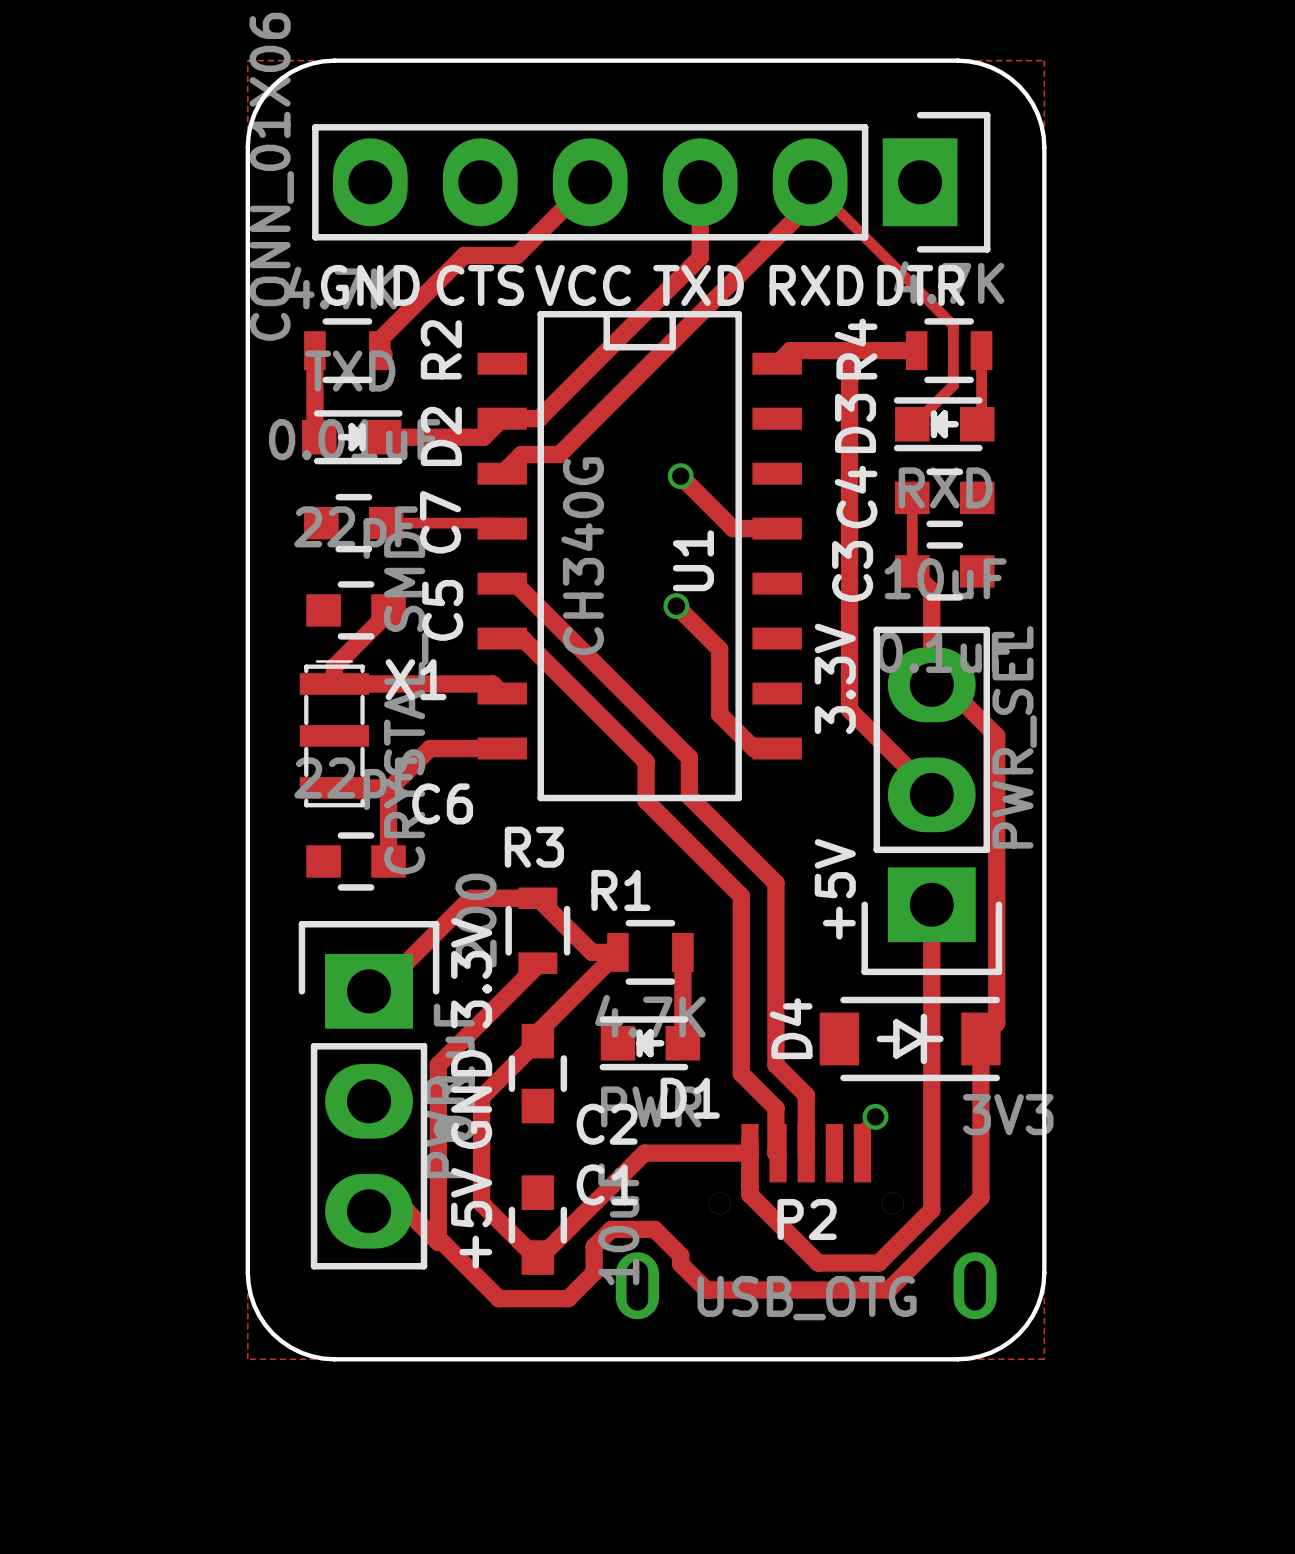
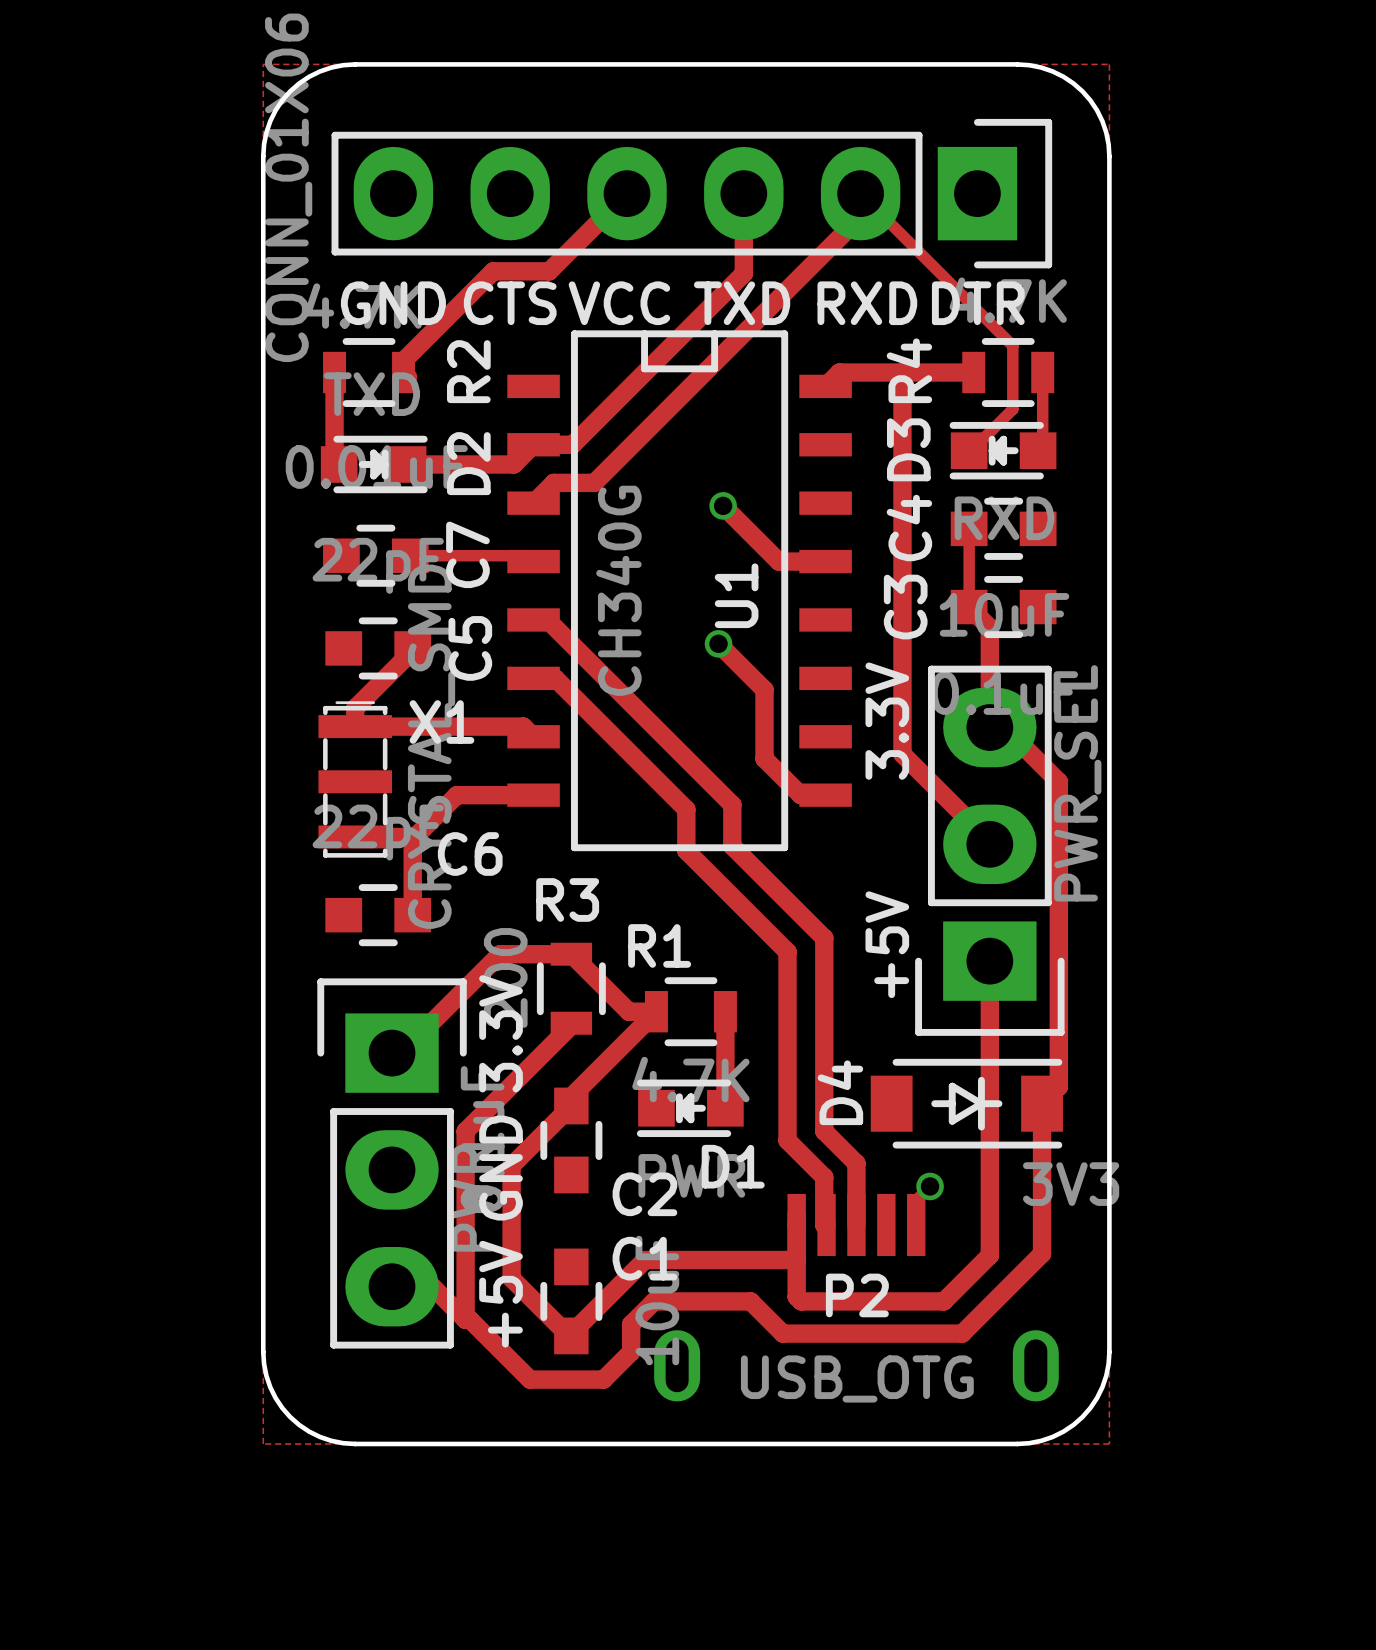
P2 footprint: [615, 1123, 997, 1320] -> [654, 1193, 1059, 1402]
track: (749, 1153) (644, 1153) (540, 1257) (537, 1257) -> none
track: (980, 1180) (980, 1197) (888, 1290) (706, 1290) (680, 1264) (680, 1255) (654, 1229) (611, 1229) -> (1042, 1253) (962, 1333) (782, 1333) (750, 1301) (654, 1301) (649, 1306)
track: (931, 1181) (931, 1210) (878, 1263) (818, 1263) (749, 1194) -> (989, 1255) (943, 1301) (801, 1301) (796, 1296) (796, 1269)
track: none -> (796, 1260) (644, 1260) (571, 1333)

